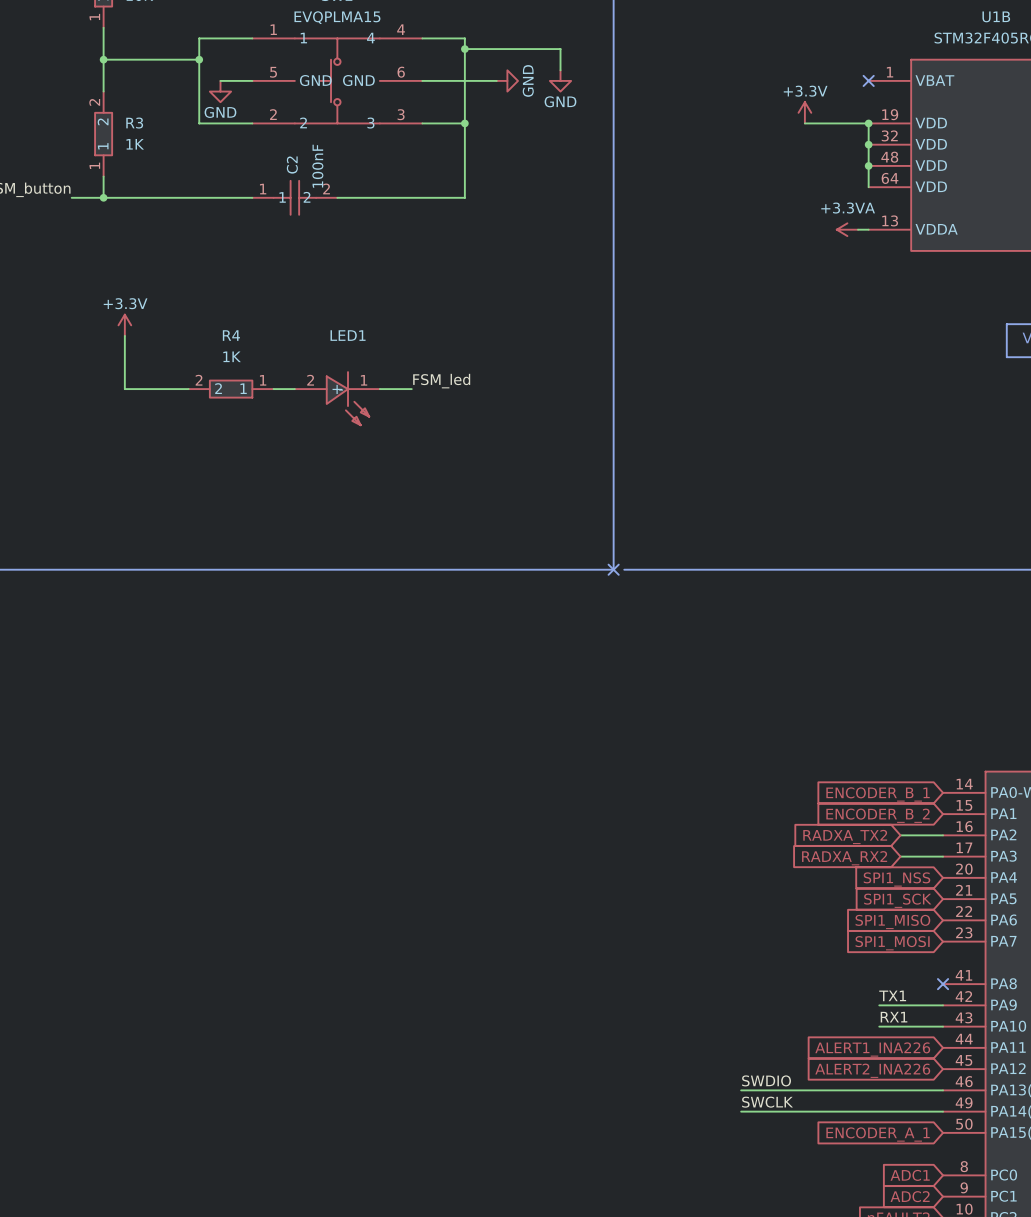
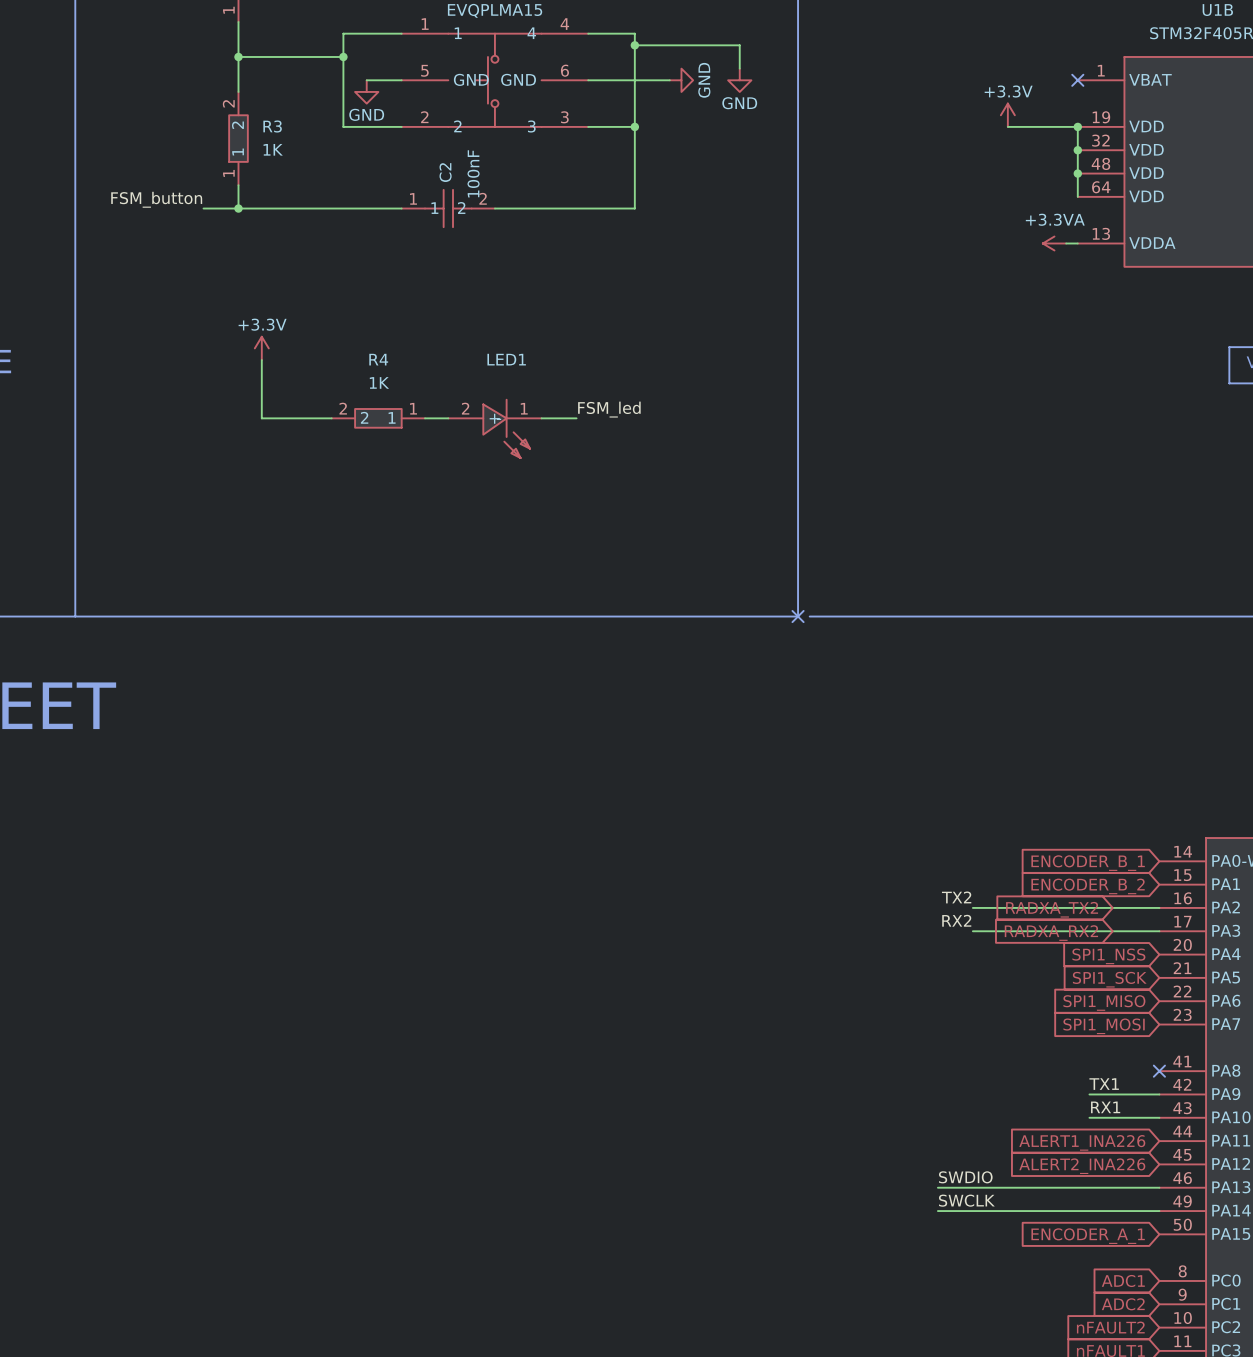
label: none -> TX2 (956, 897)
wire: none -> (972, 907) (1112, 907)
label: none -> RX2 (956, 920)
wire: none -> (972, 931) (1112, 931)

